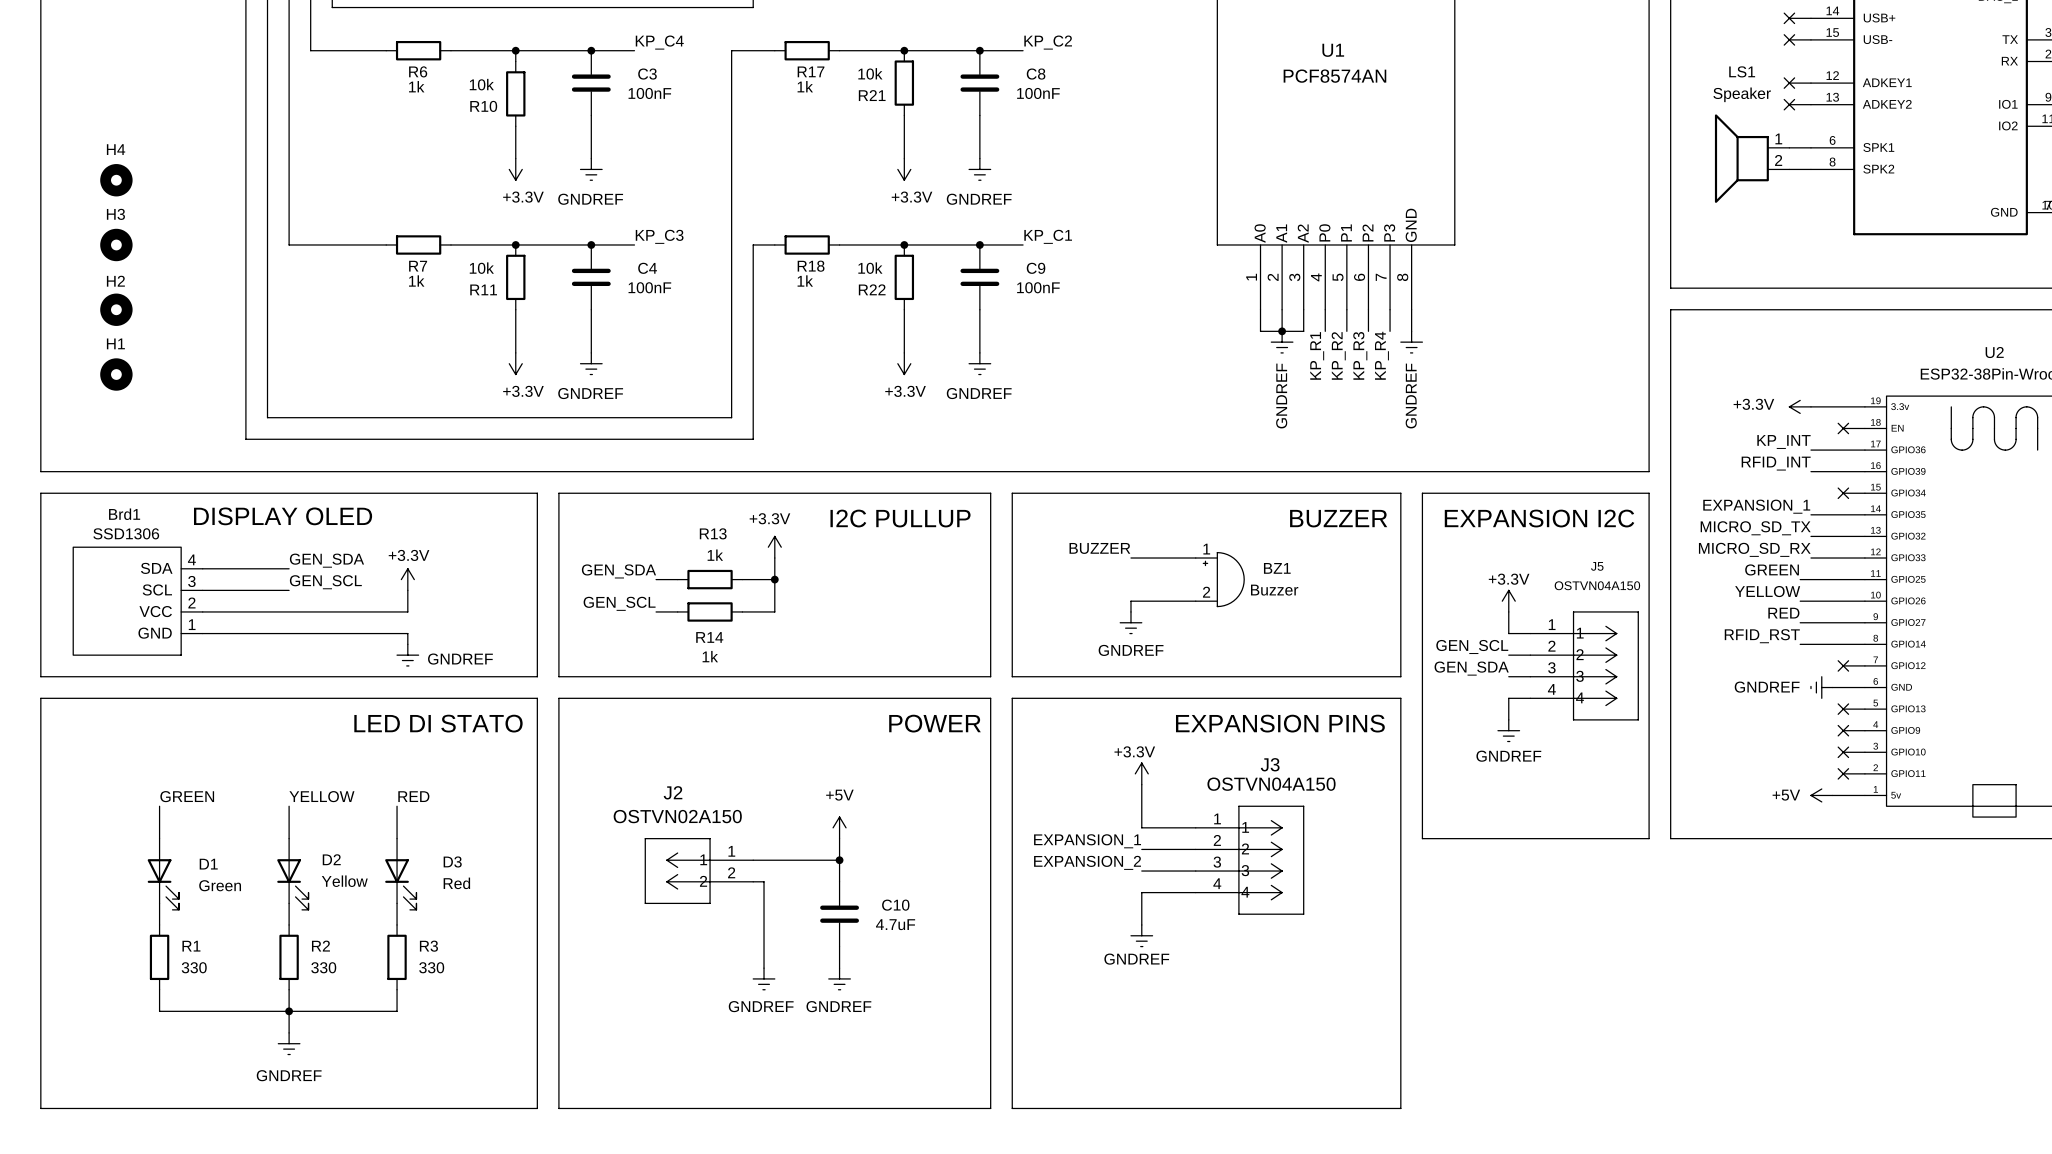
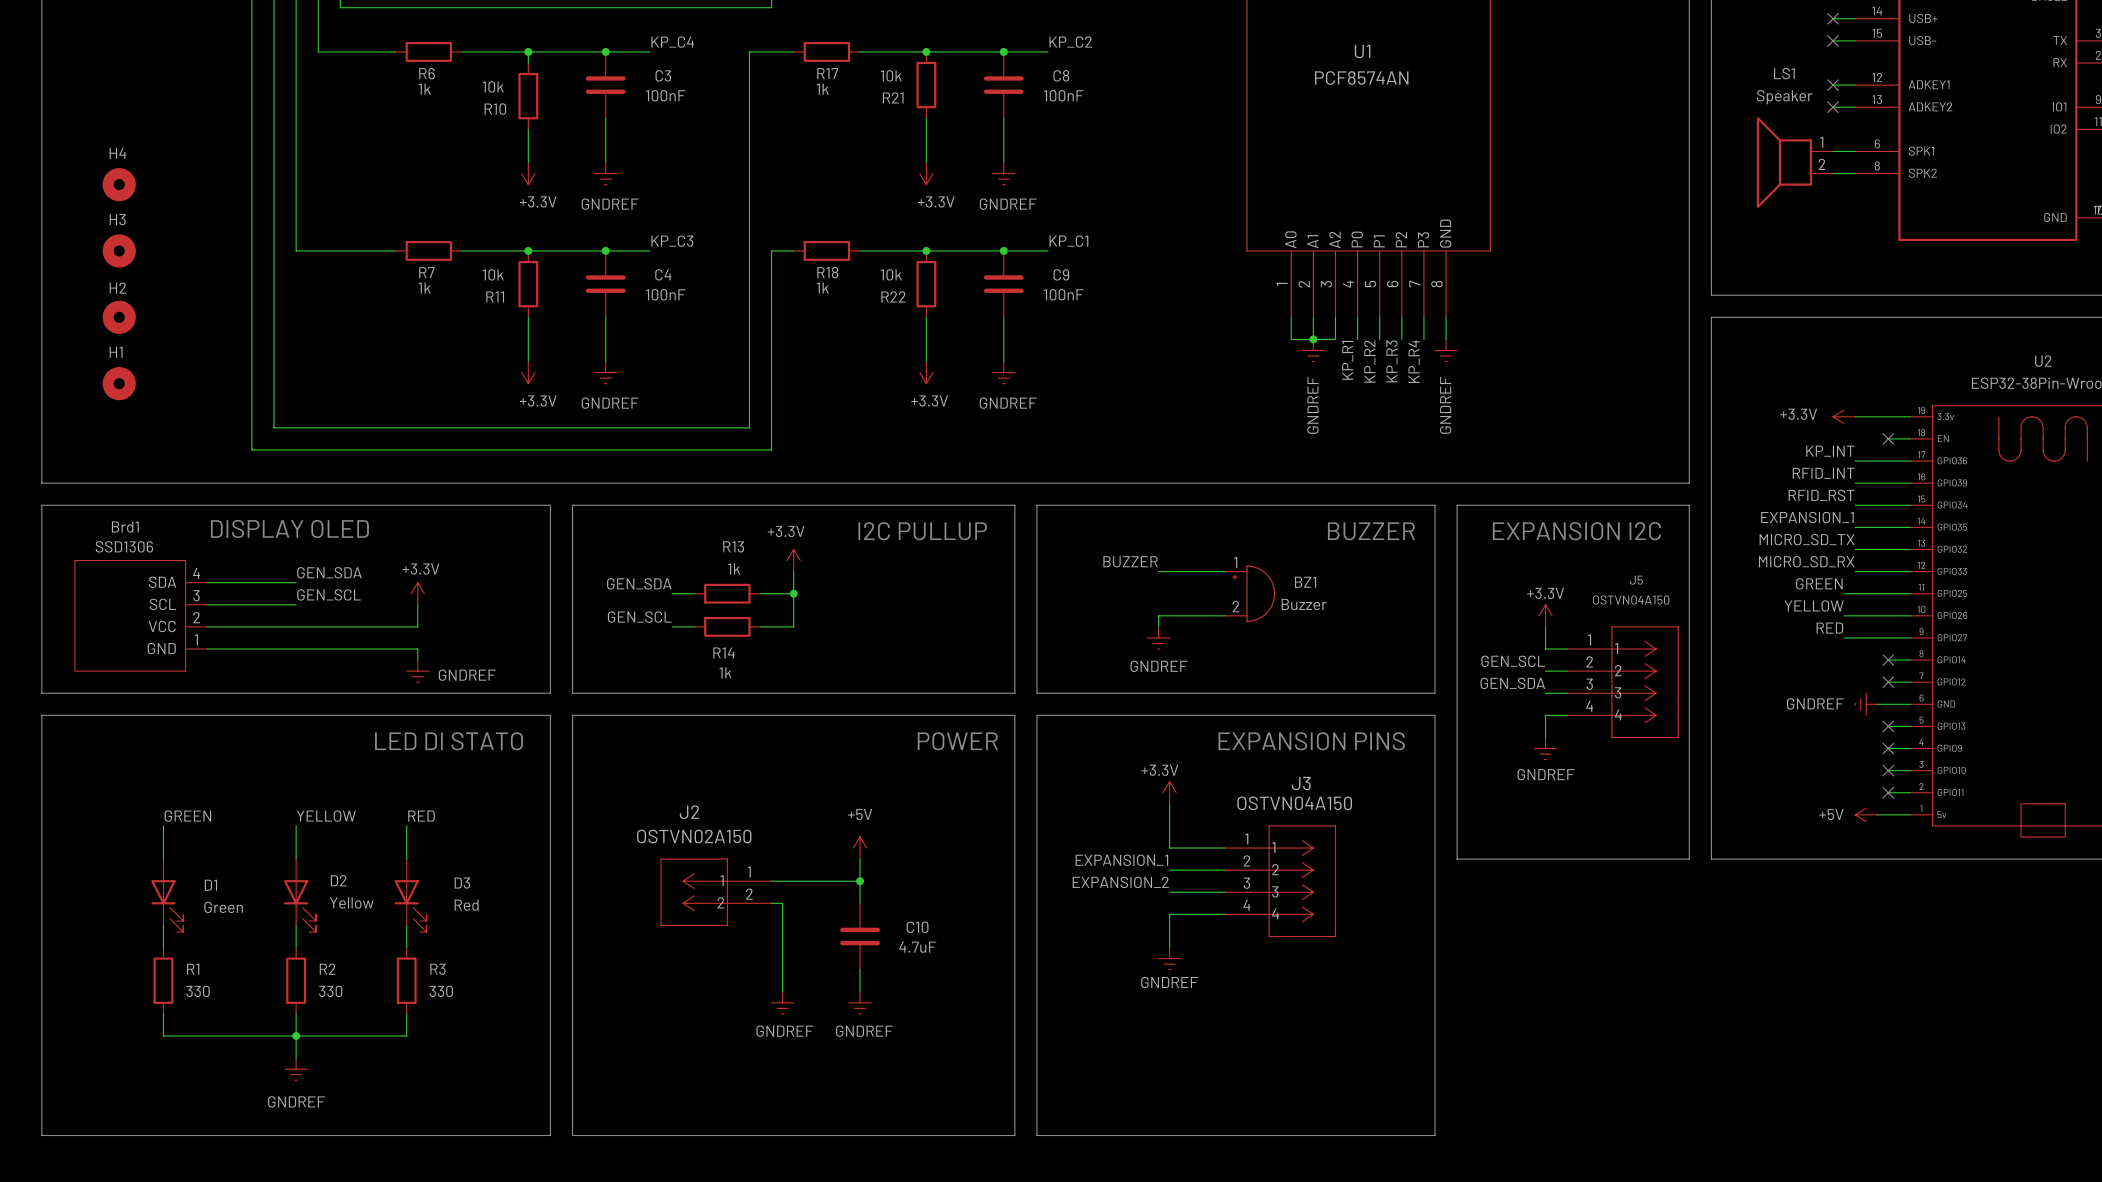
wire: none -> (1855, 505) (1888, 505)
no-connect mark: (1843, 493) -> none
label position: RFID_RST (1762, 636) -> RFID_RST (1821, 495)
wire: (1800, 644) (1843, 644) -> none
no-connect mark: none -> (1888, 660)

